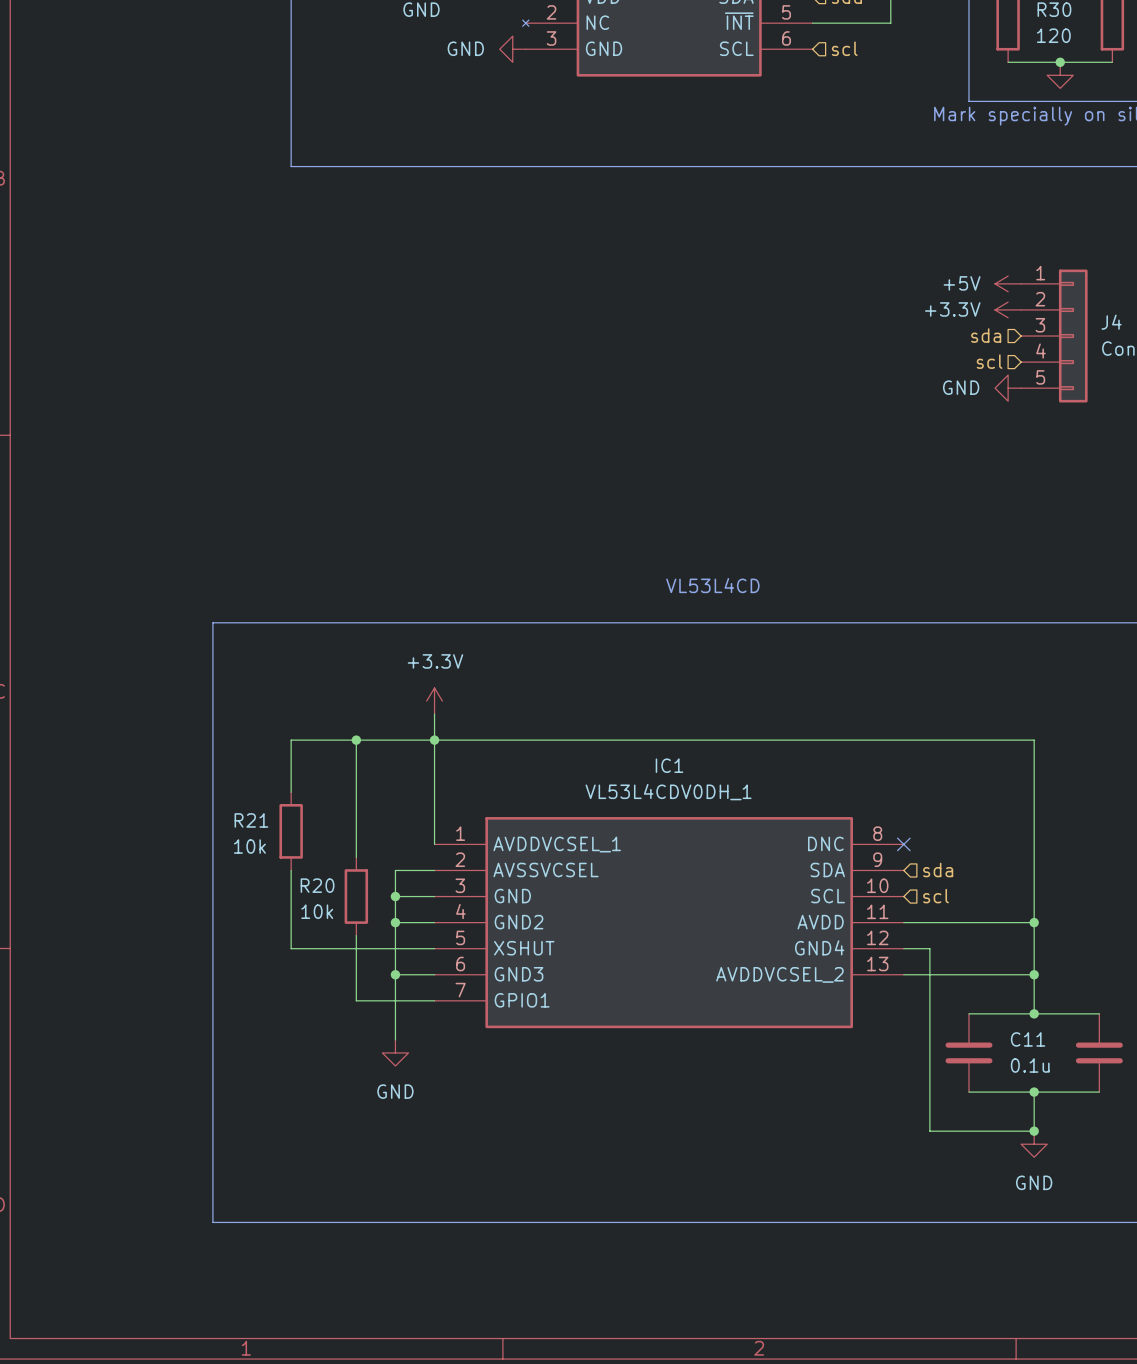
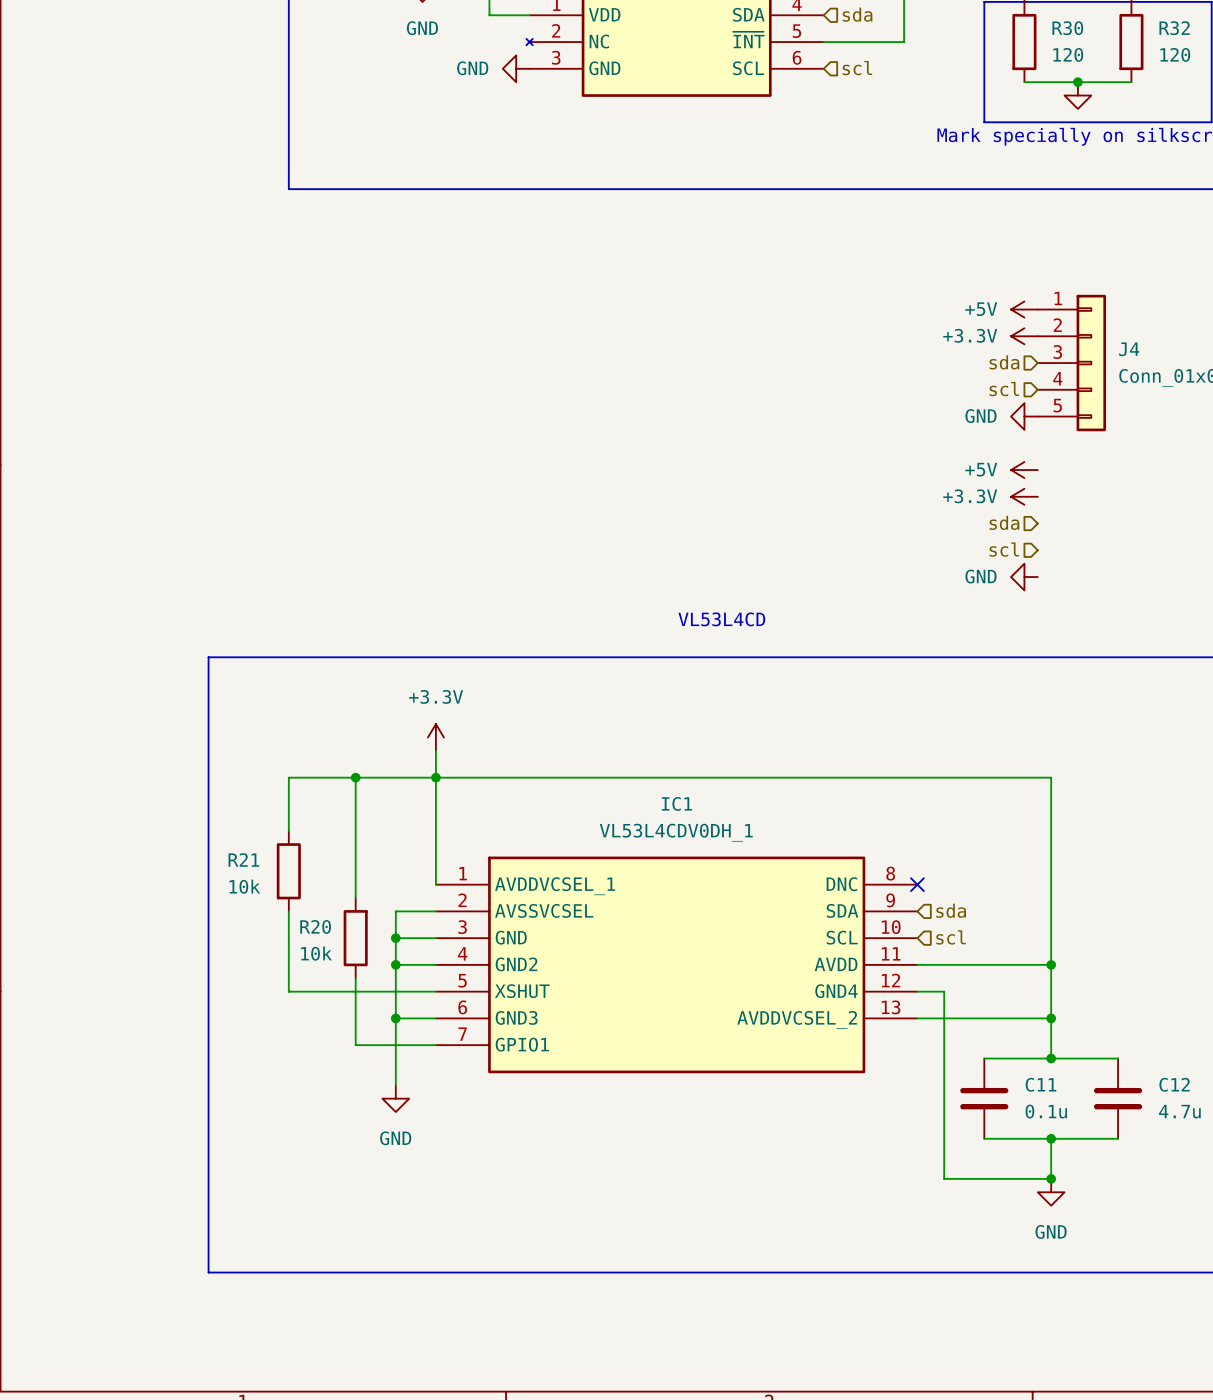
power symbol: none -> +5V (1024, 470)
power symbol: none -> +3.3V (1024, 496)
hierarchical label: none -> sda (1004, 522)
hierarchical label: none -> scl (1004, 549)
power symbol: none -> GND (1024, 577)

